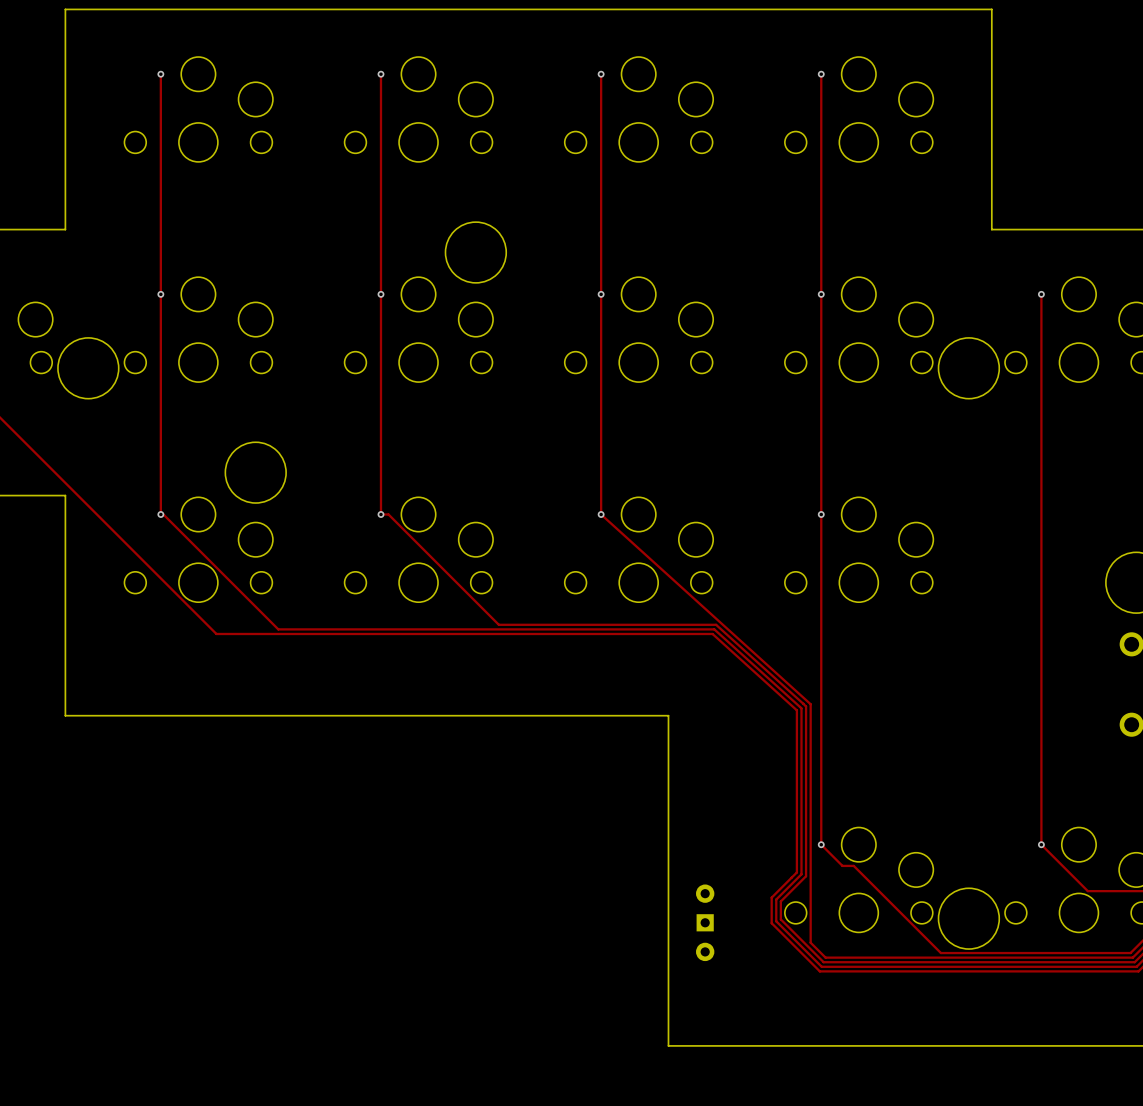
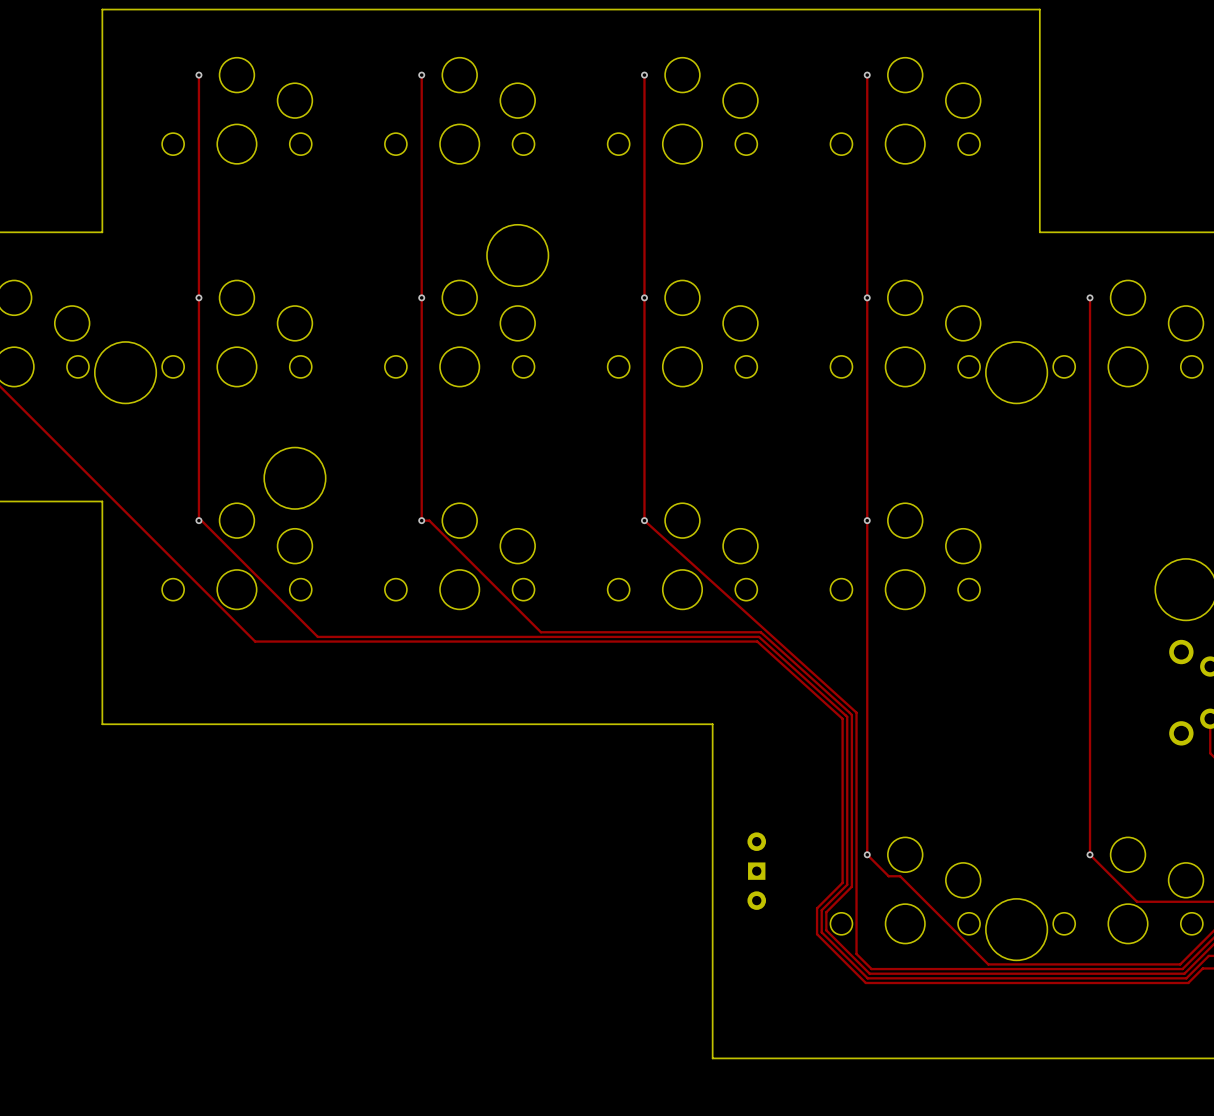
part position: (705, 922) -> (756, 871)

